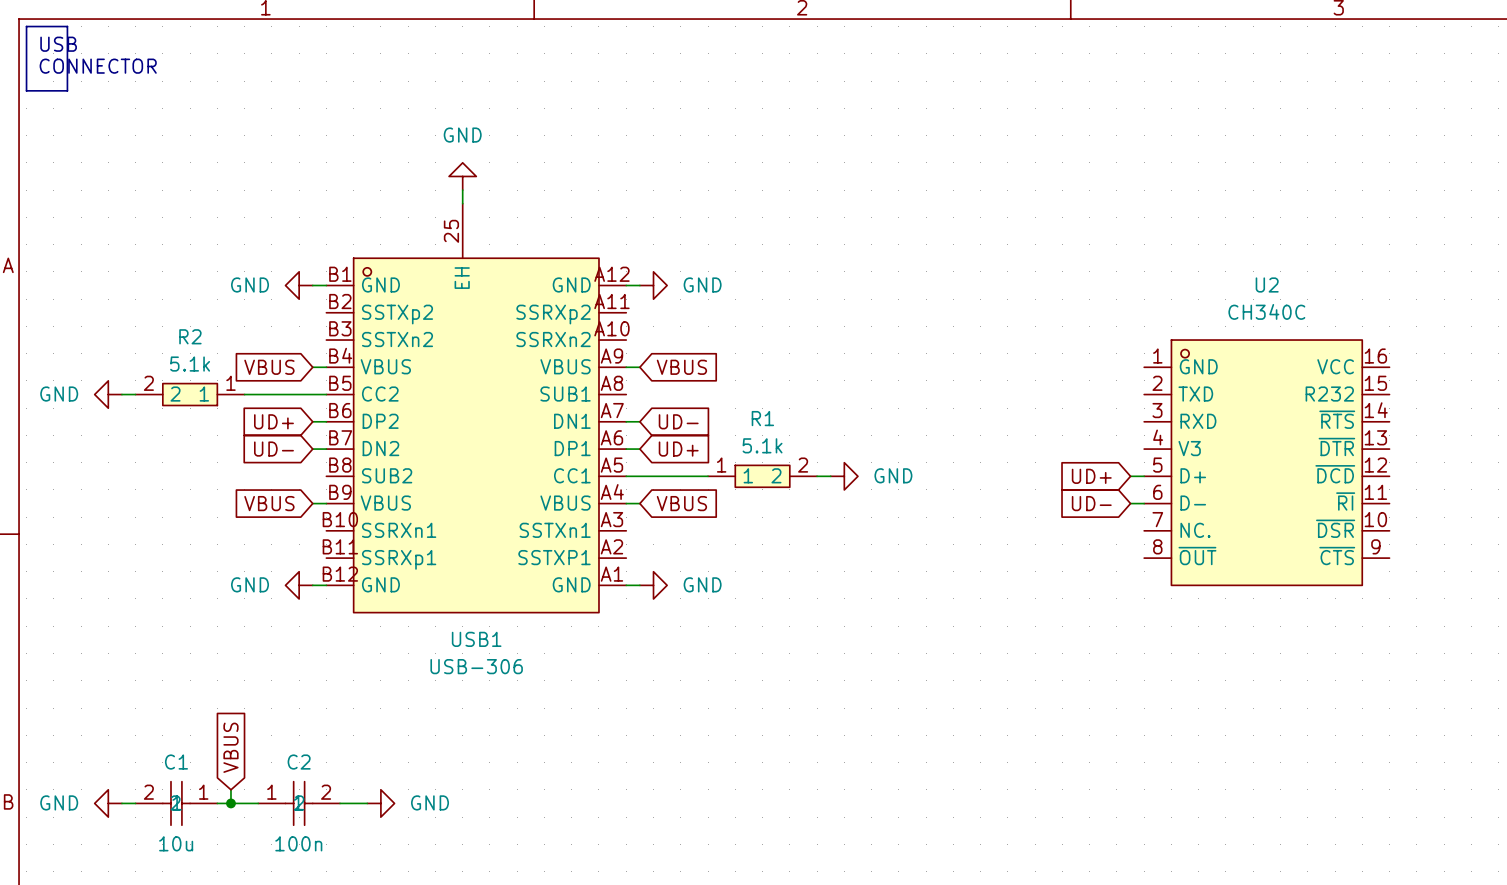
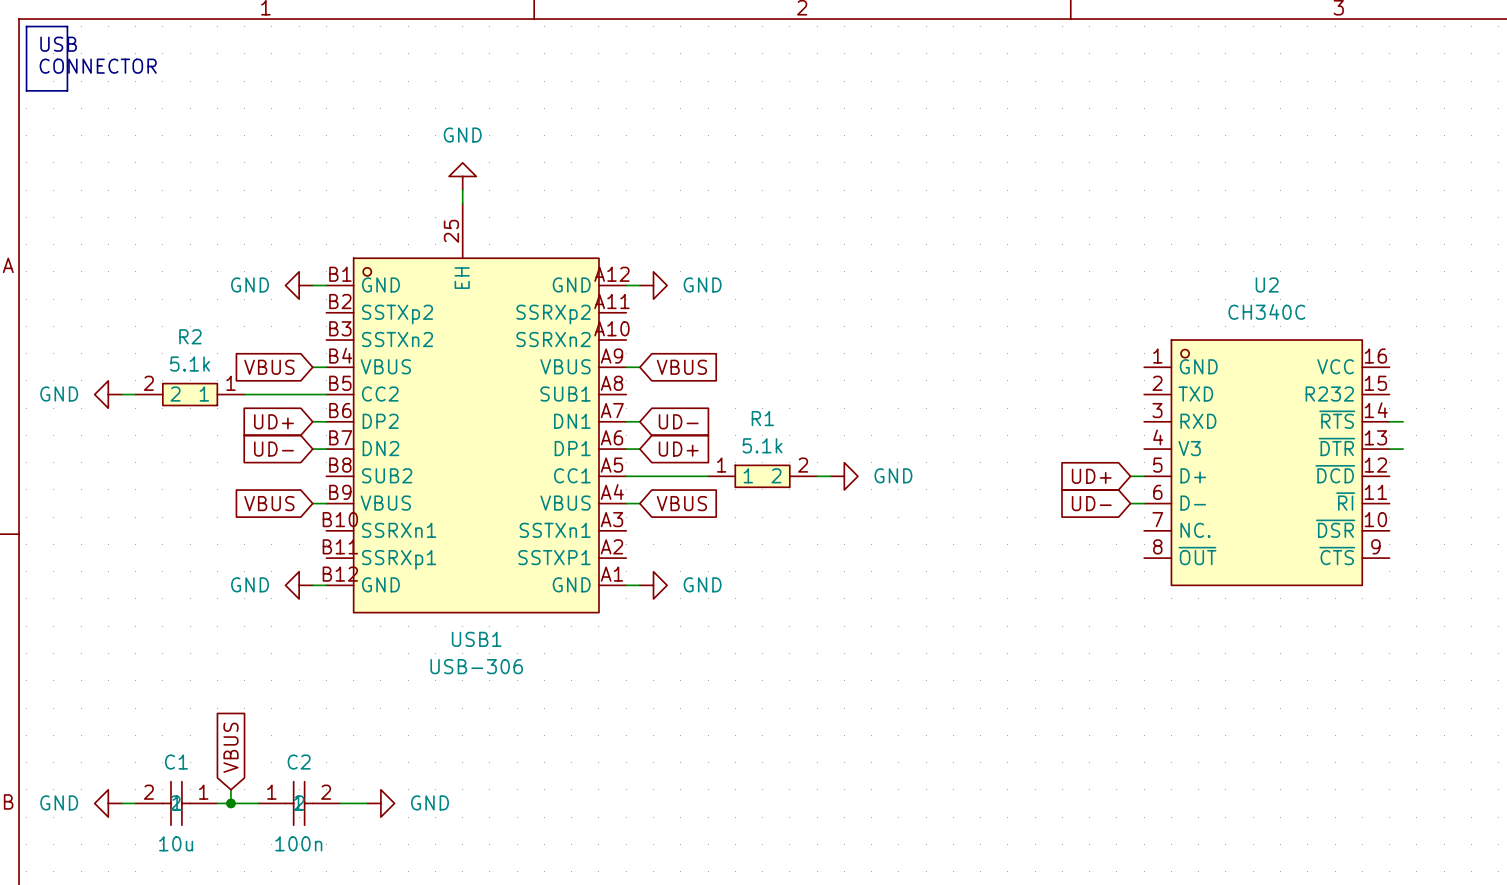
wire: none -> (1389, 421) (1403, 421)
wire: none -> (1389, 449) (1403, 449)

